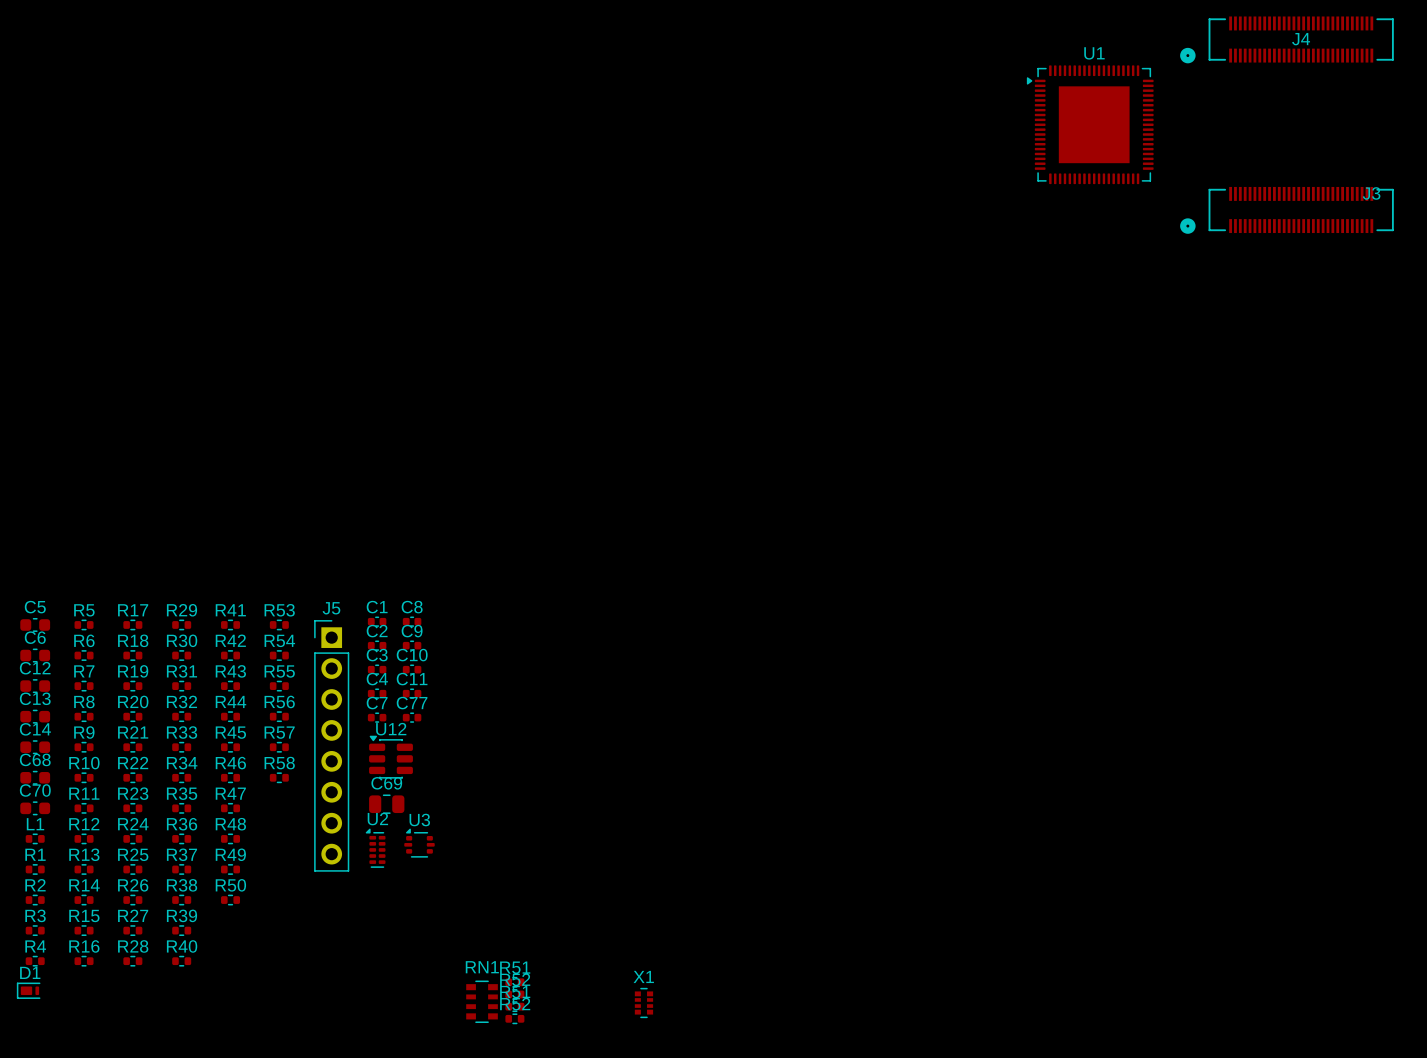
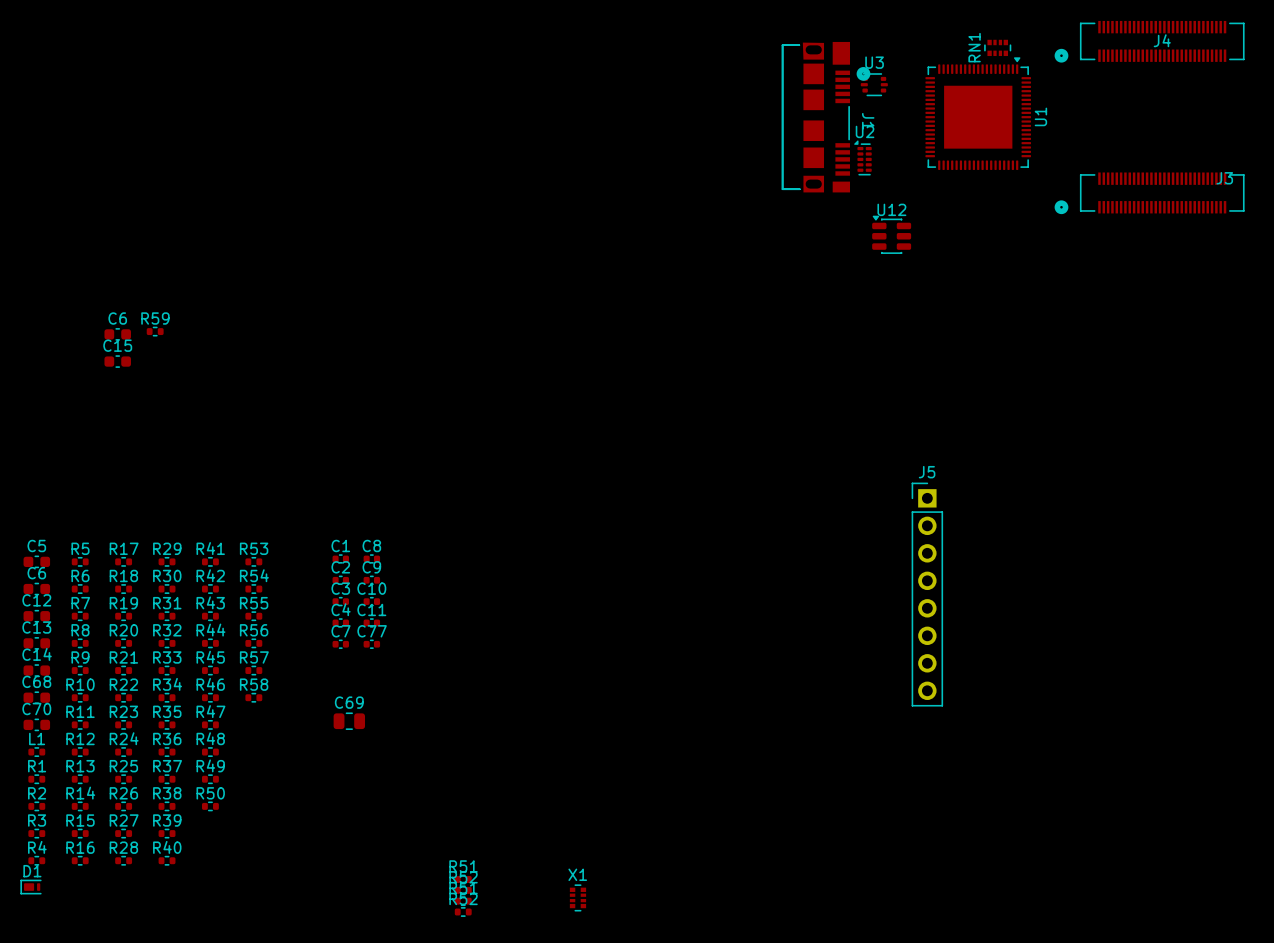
J1: none -> (826, 117)
U1 rotation: 0° (1090, 124) -> 90° clockwise (978, 113)
R59: none -> (155, 331)
C6: none -> (117, 334)
C15: none -> (117, 361)
J5 position: (331, 745) -> (927, 594)
U12 position: (391, 757) -> (891, 234)
U3 position: (419, 843) -> (874, 83)
U2 position: (375, 848) -> (862, 157)
RN1 name position: RN1 (482, 967) -> RN1 (974, 47)
RN1 footprint: [466, 980, 498, 1023] -> [984, 39, 1012, 57]

